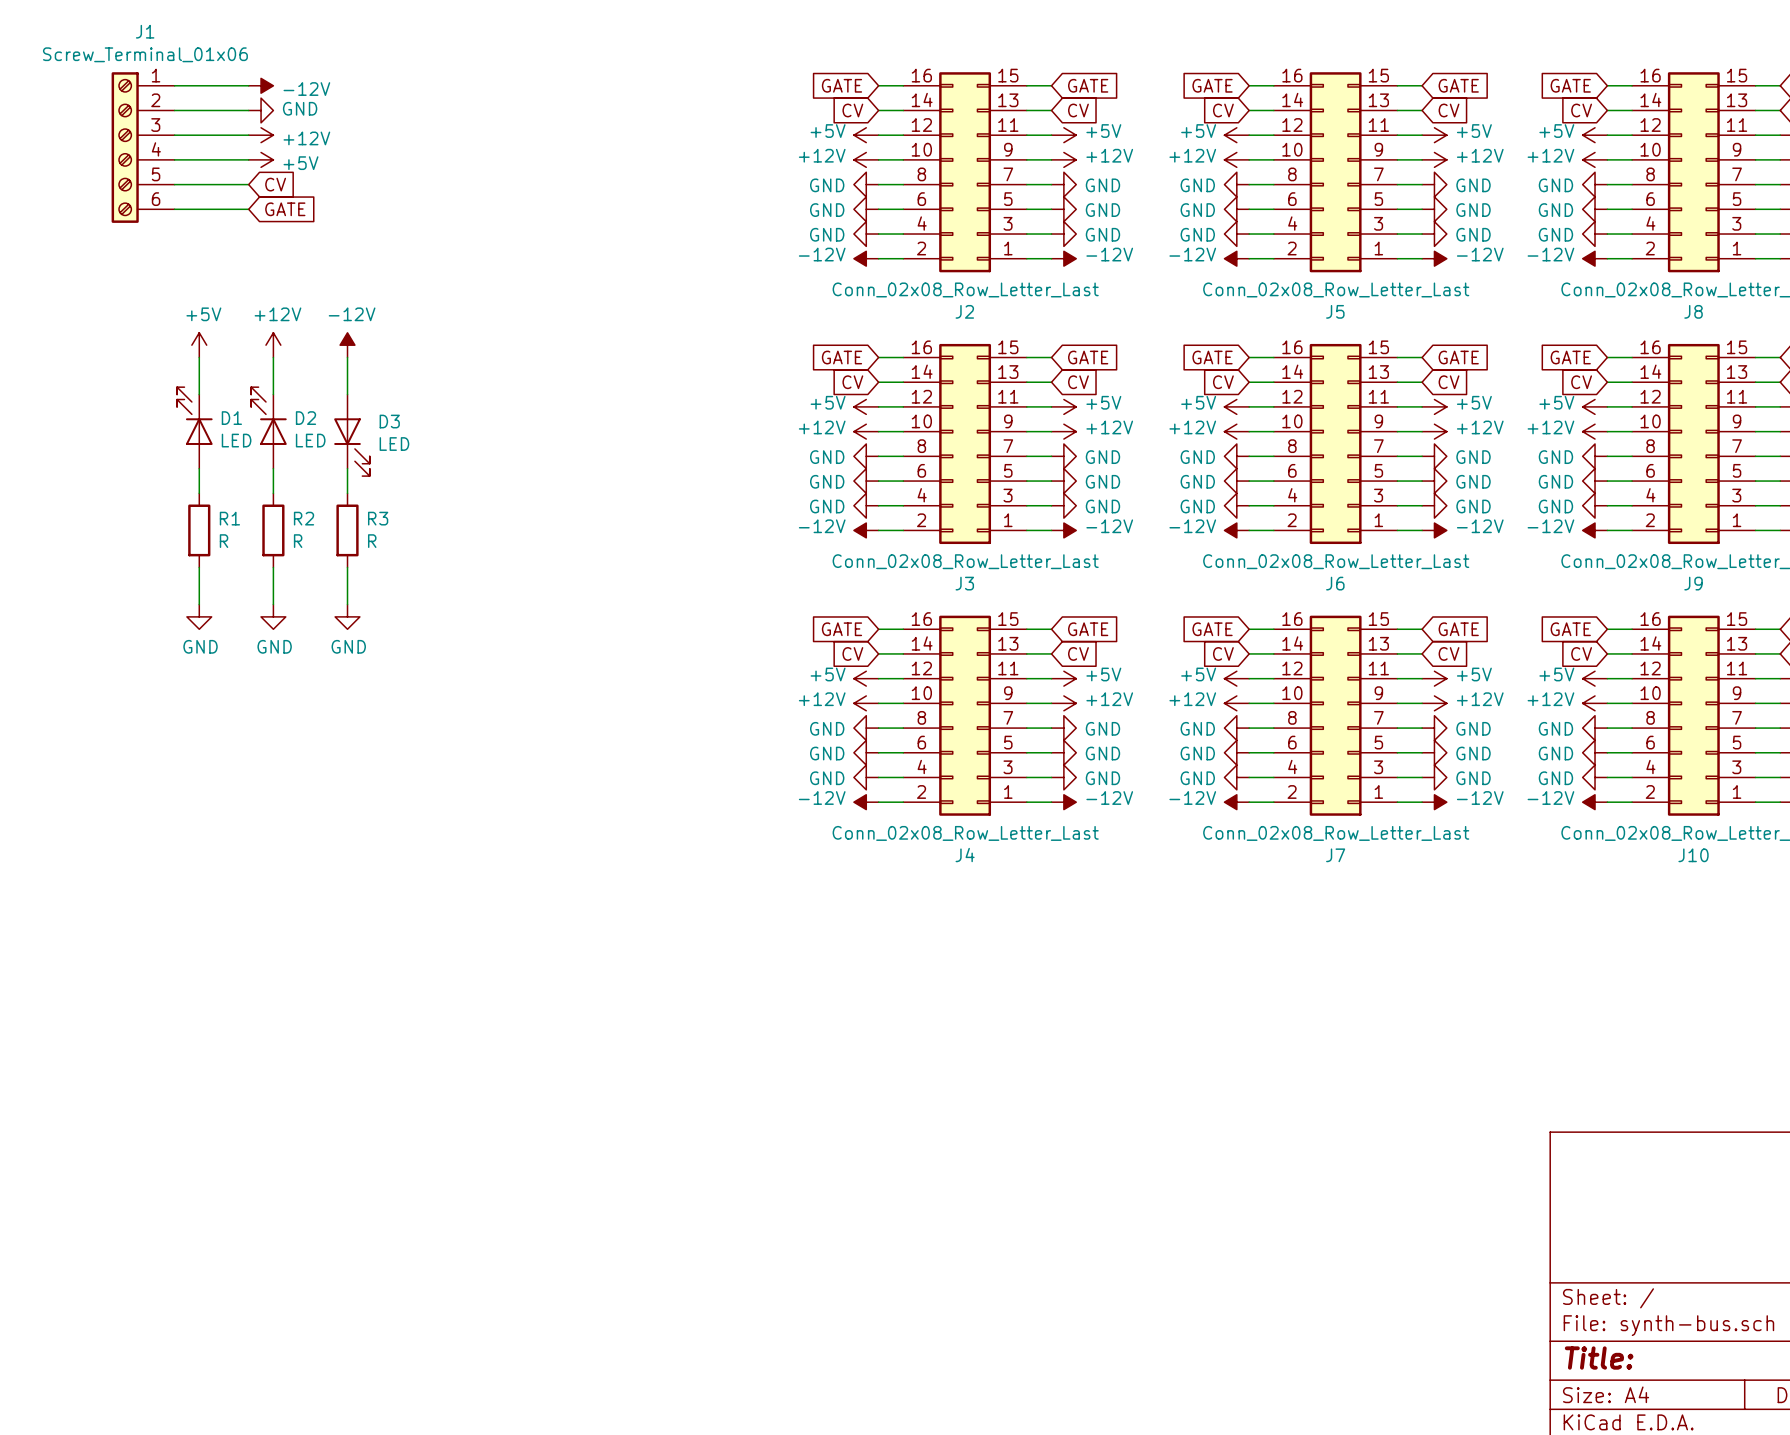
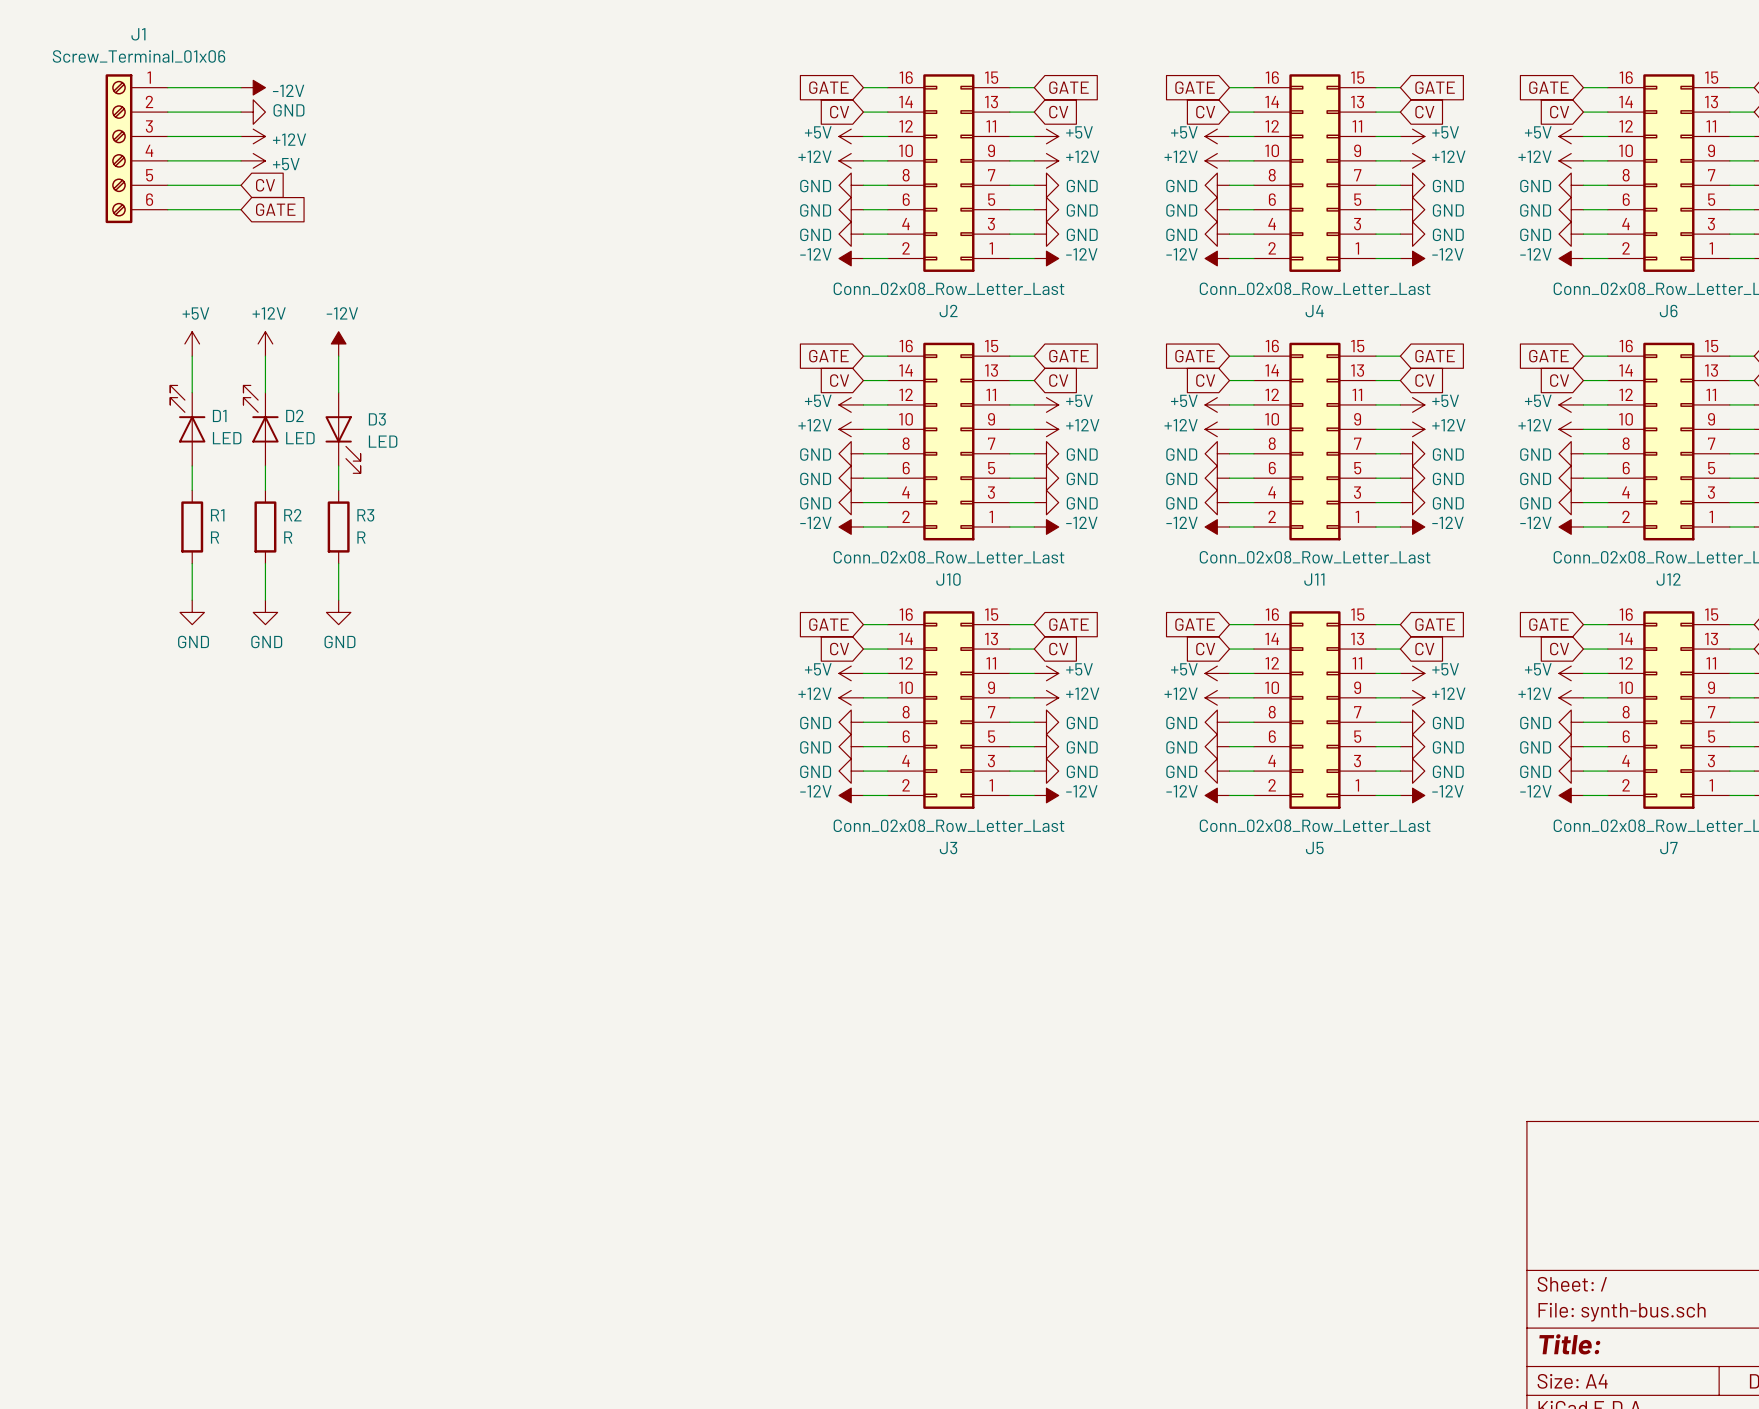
J5 name: J5 (1335, 311) -> J4 (1314, 311)
J8 name: J8 (1693, 311) -> J6 (1668, 311)
J3 name: J3 (964, 583) -> J10 (948, 579)
J6 name: J6 (1335, 583) -> J11 (1314, 579)
J9 name: J9 (1693, 583) -> J12 (1668, 579)
J4 name: J4 (965, 855) -> J3 (948, 848)
J7 name: J7 (1335, 855) -> J5 (1314, 848)
J10 name: J10 (1693, 855) -> J7 (1668, 848)

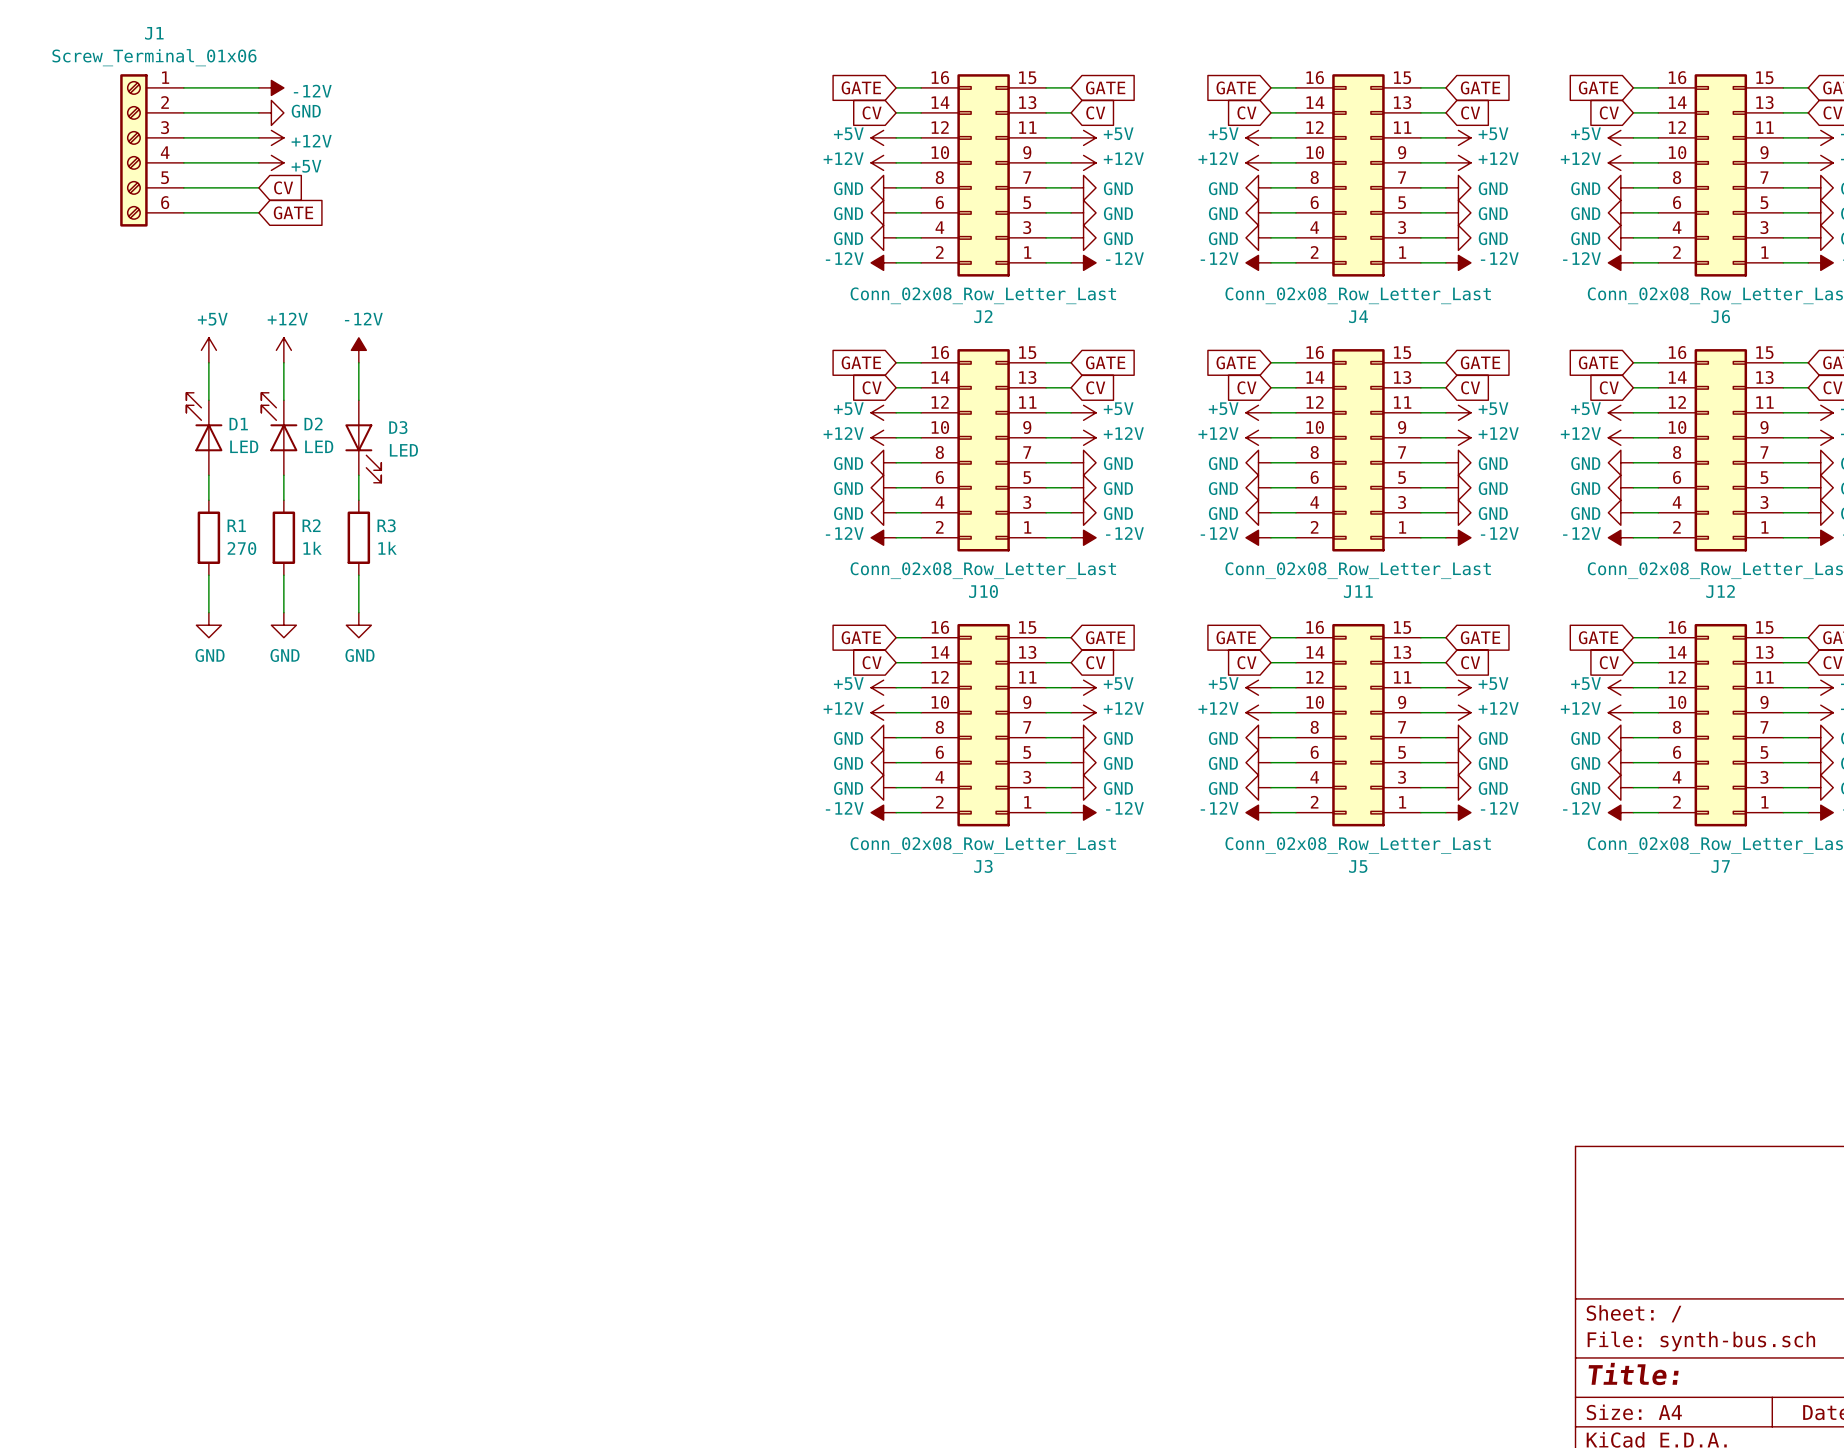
R1 value: R (215, 537) -> 270 (241, 548)
R2 value: R (288, 537) -> 1k (312, 548)
R3 value: R (361, 537) -> 1k (387, 548)

